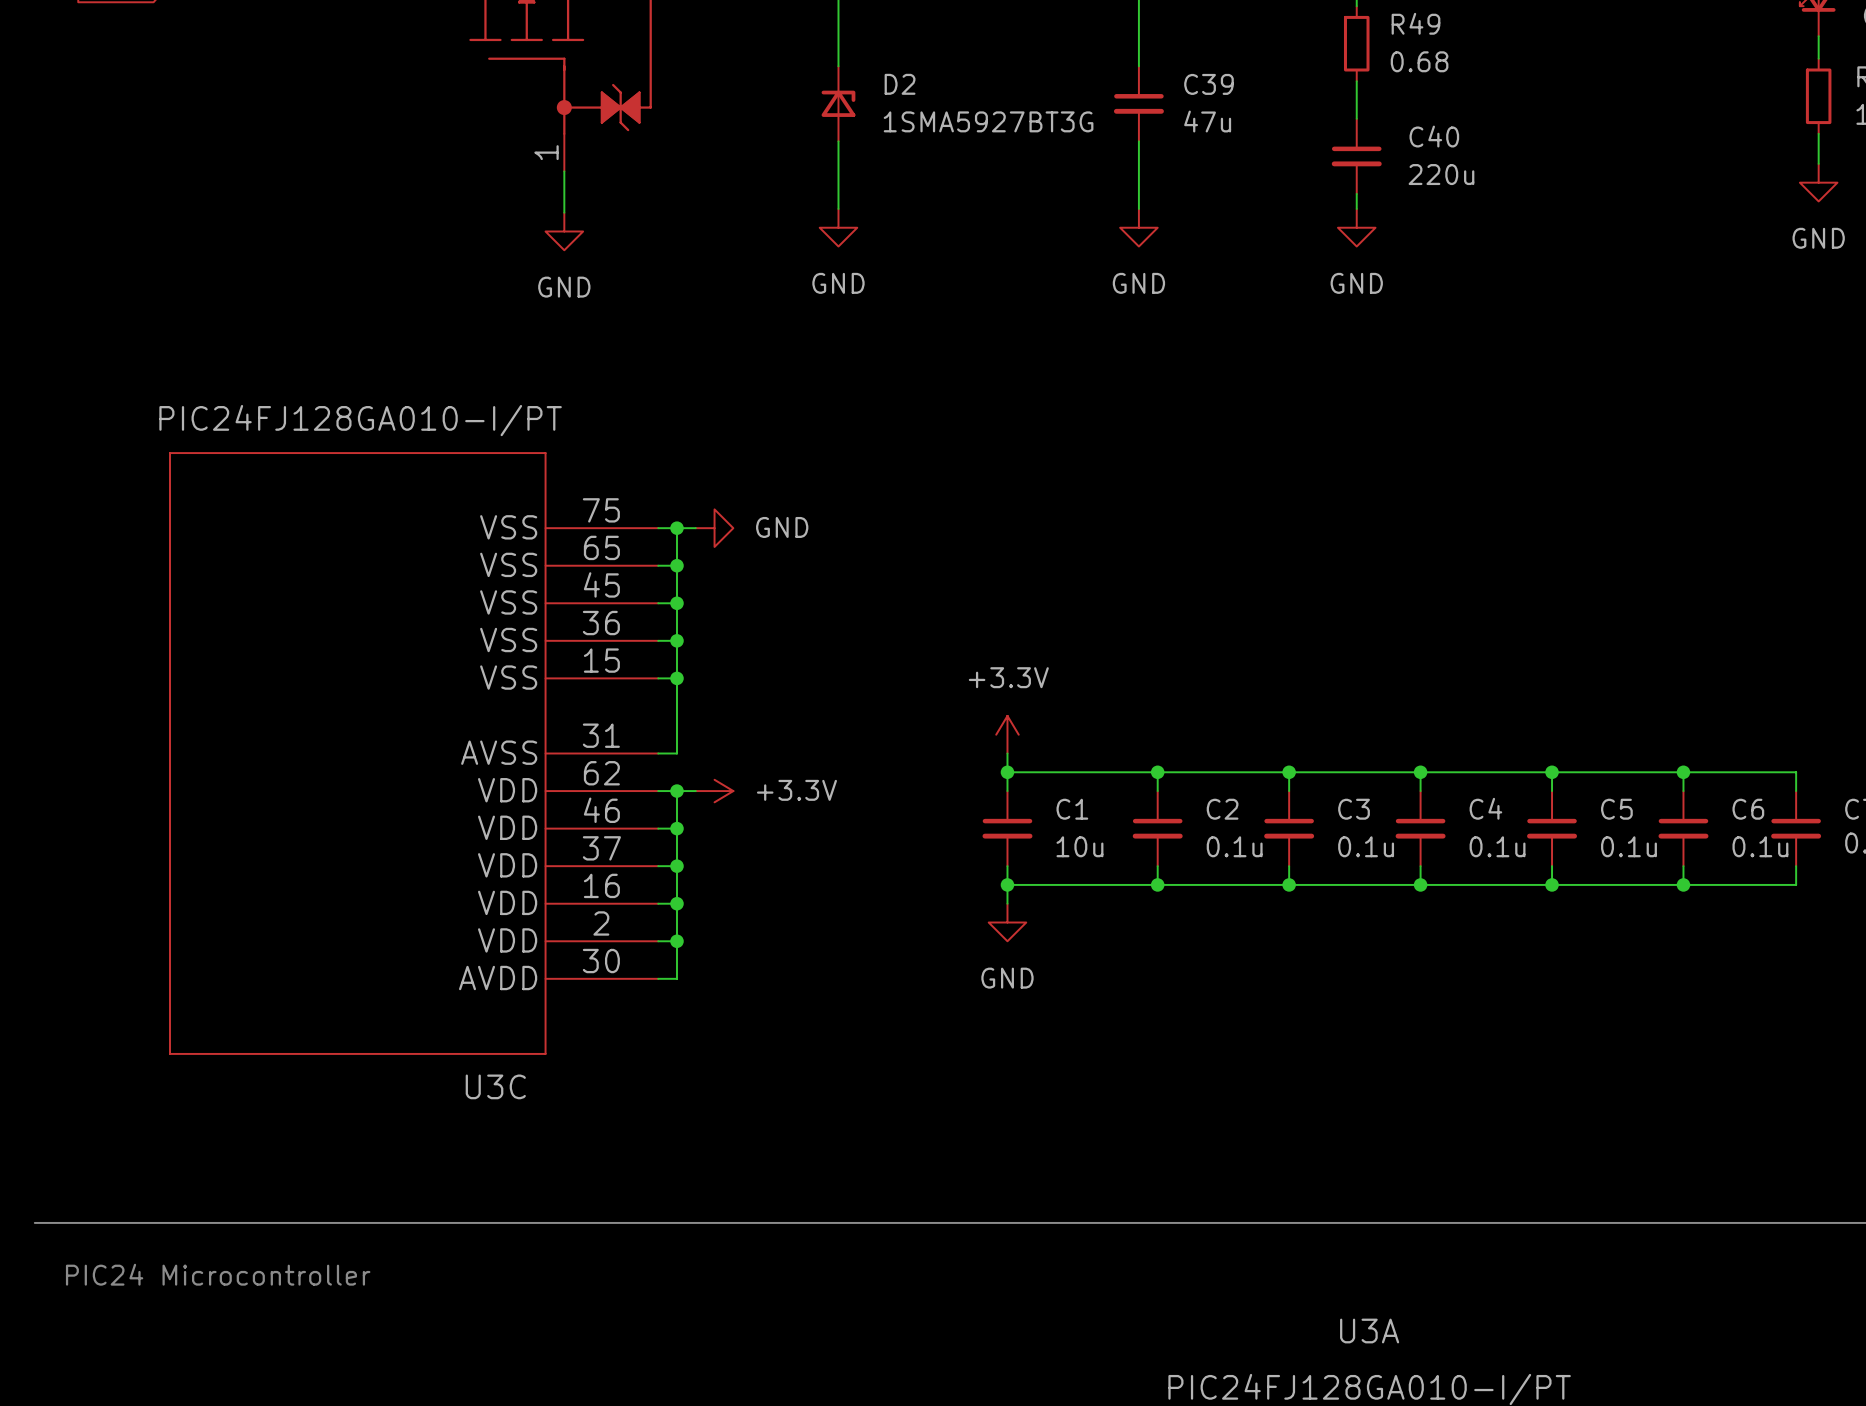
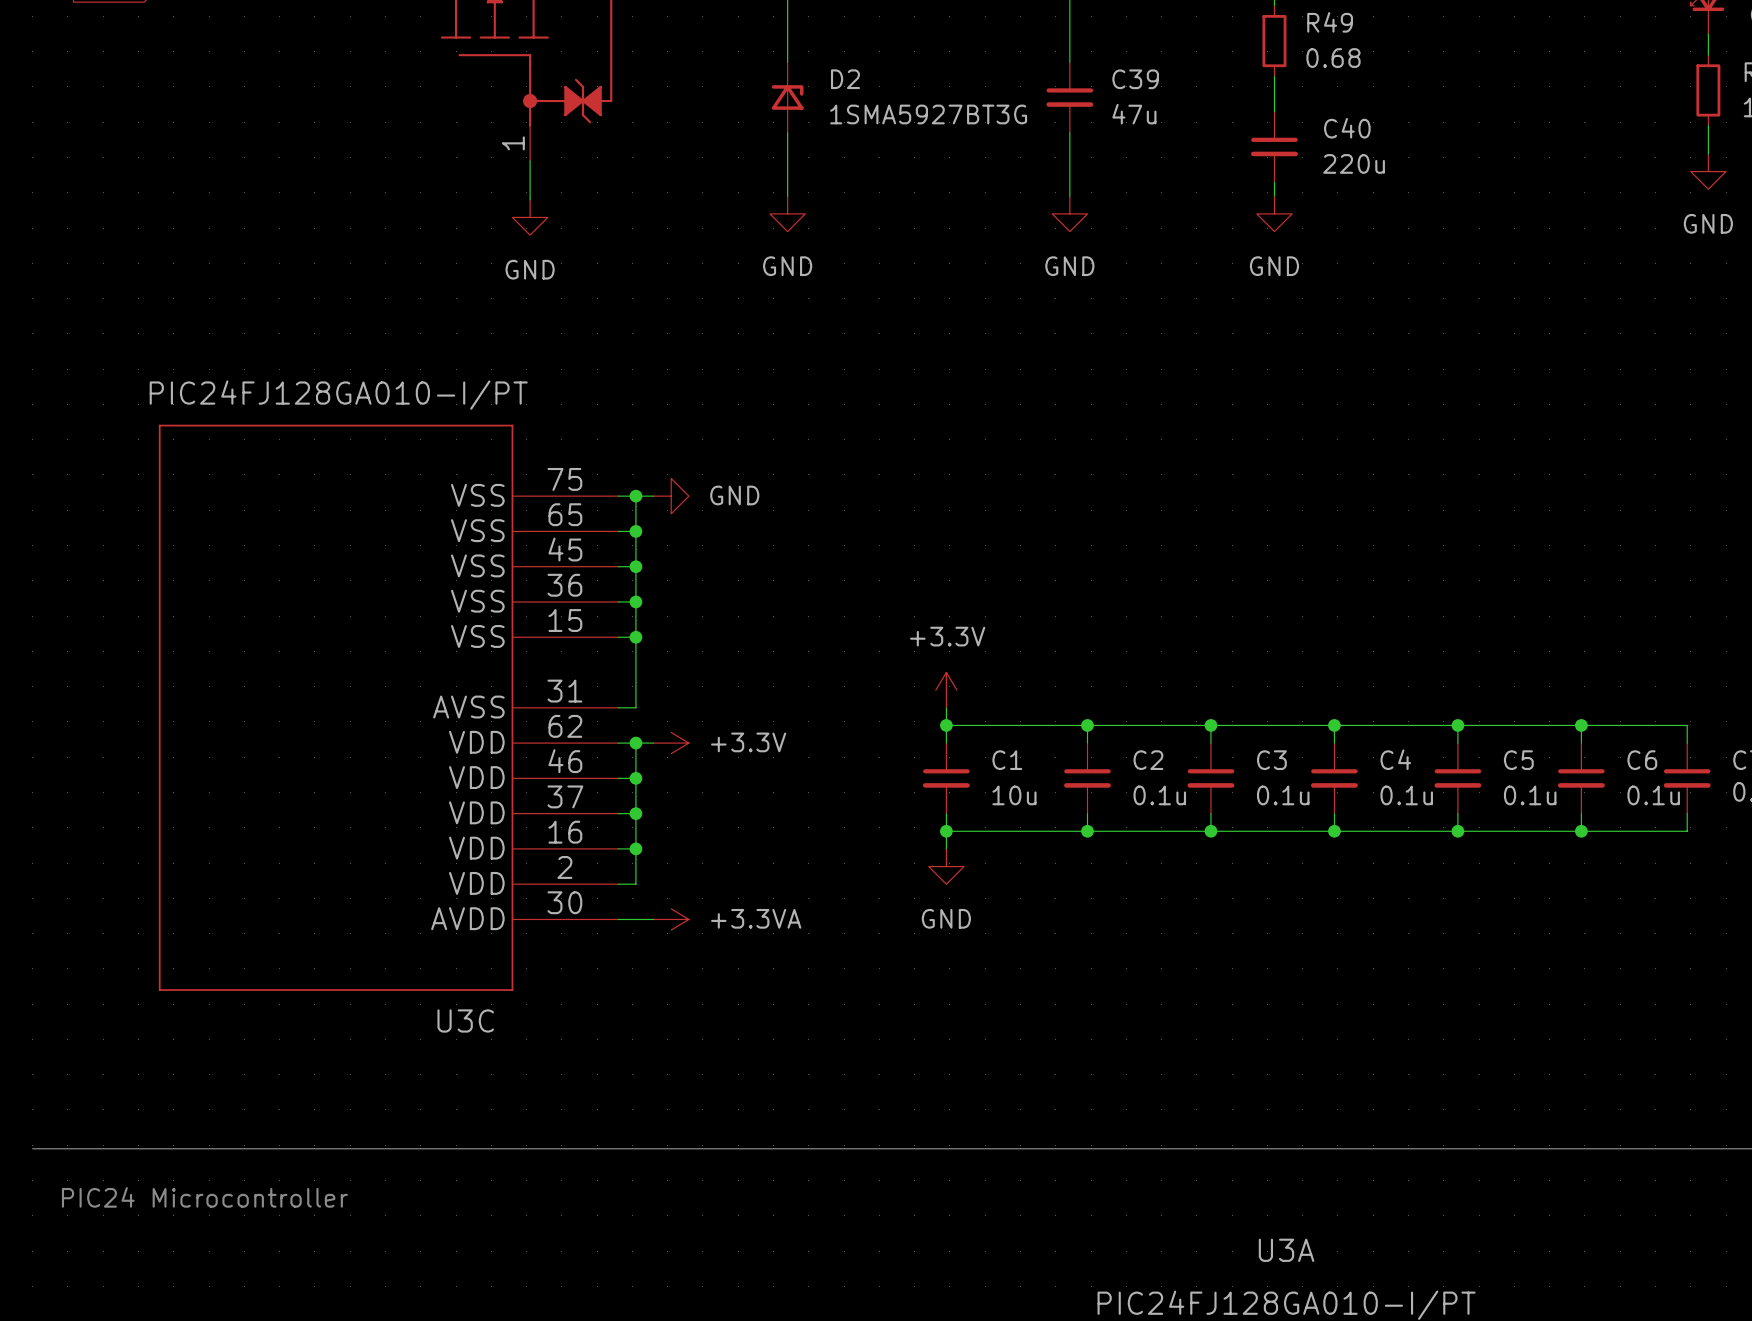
wire: (676, 941) (676, 978) -> (653, 919) (635, 919)
junction: (676, 941) -> none
power symbol: none -> +3.3VA (671, 919)

